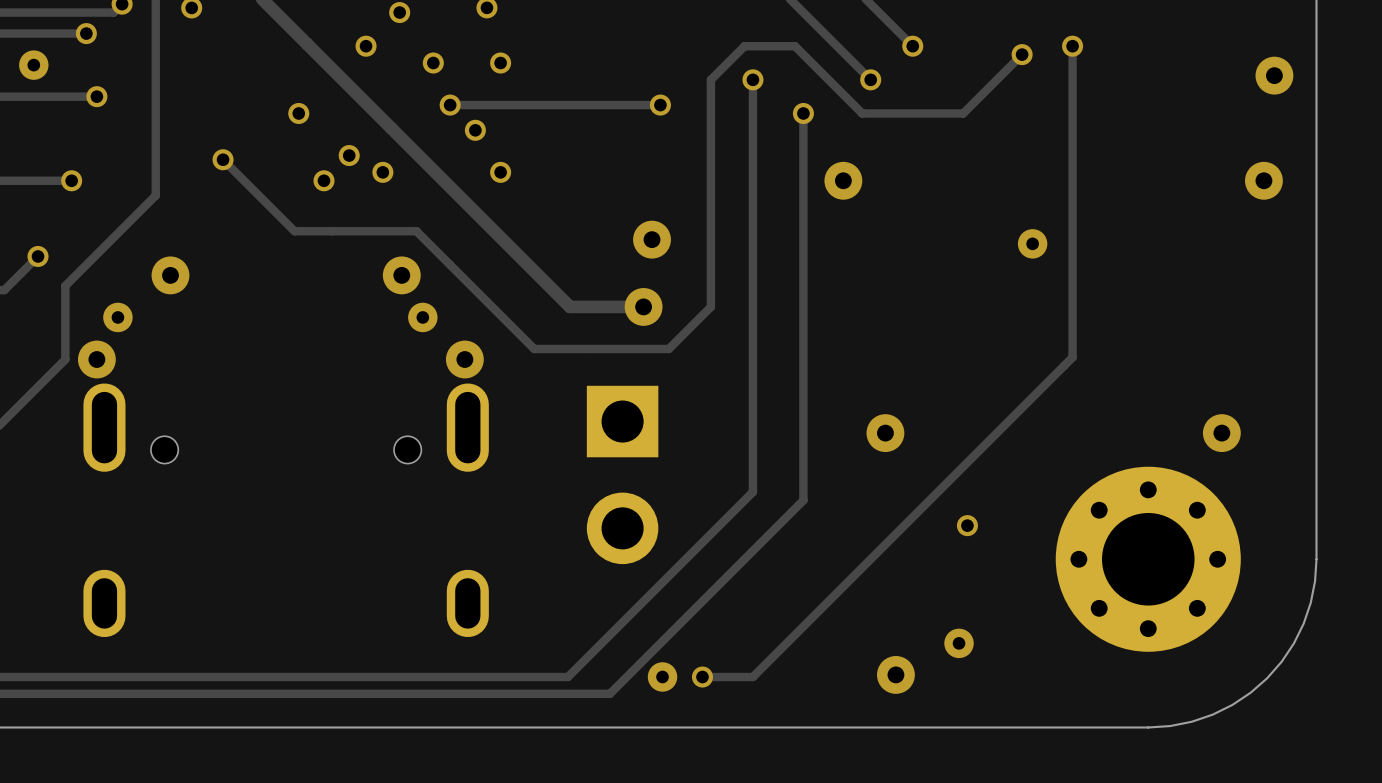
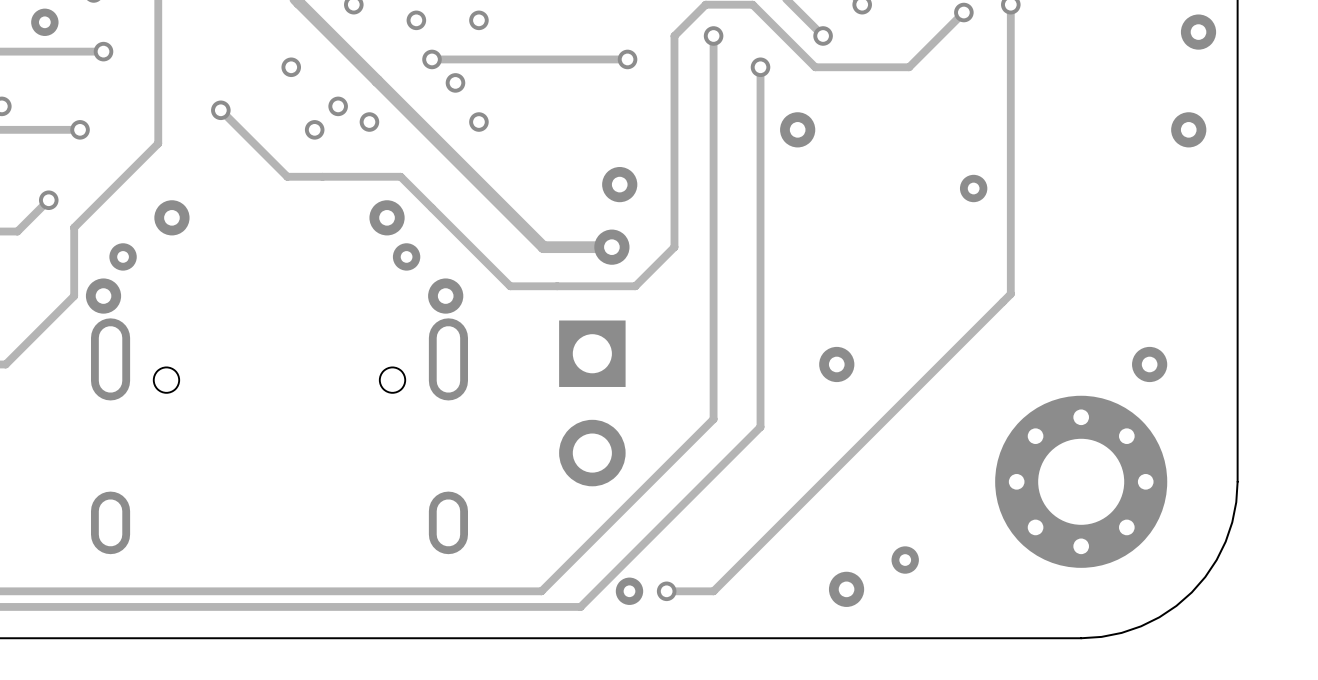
via: (967, 525) -> none

